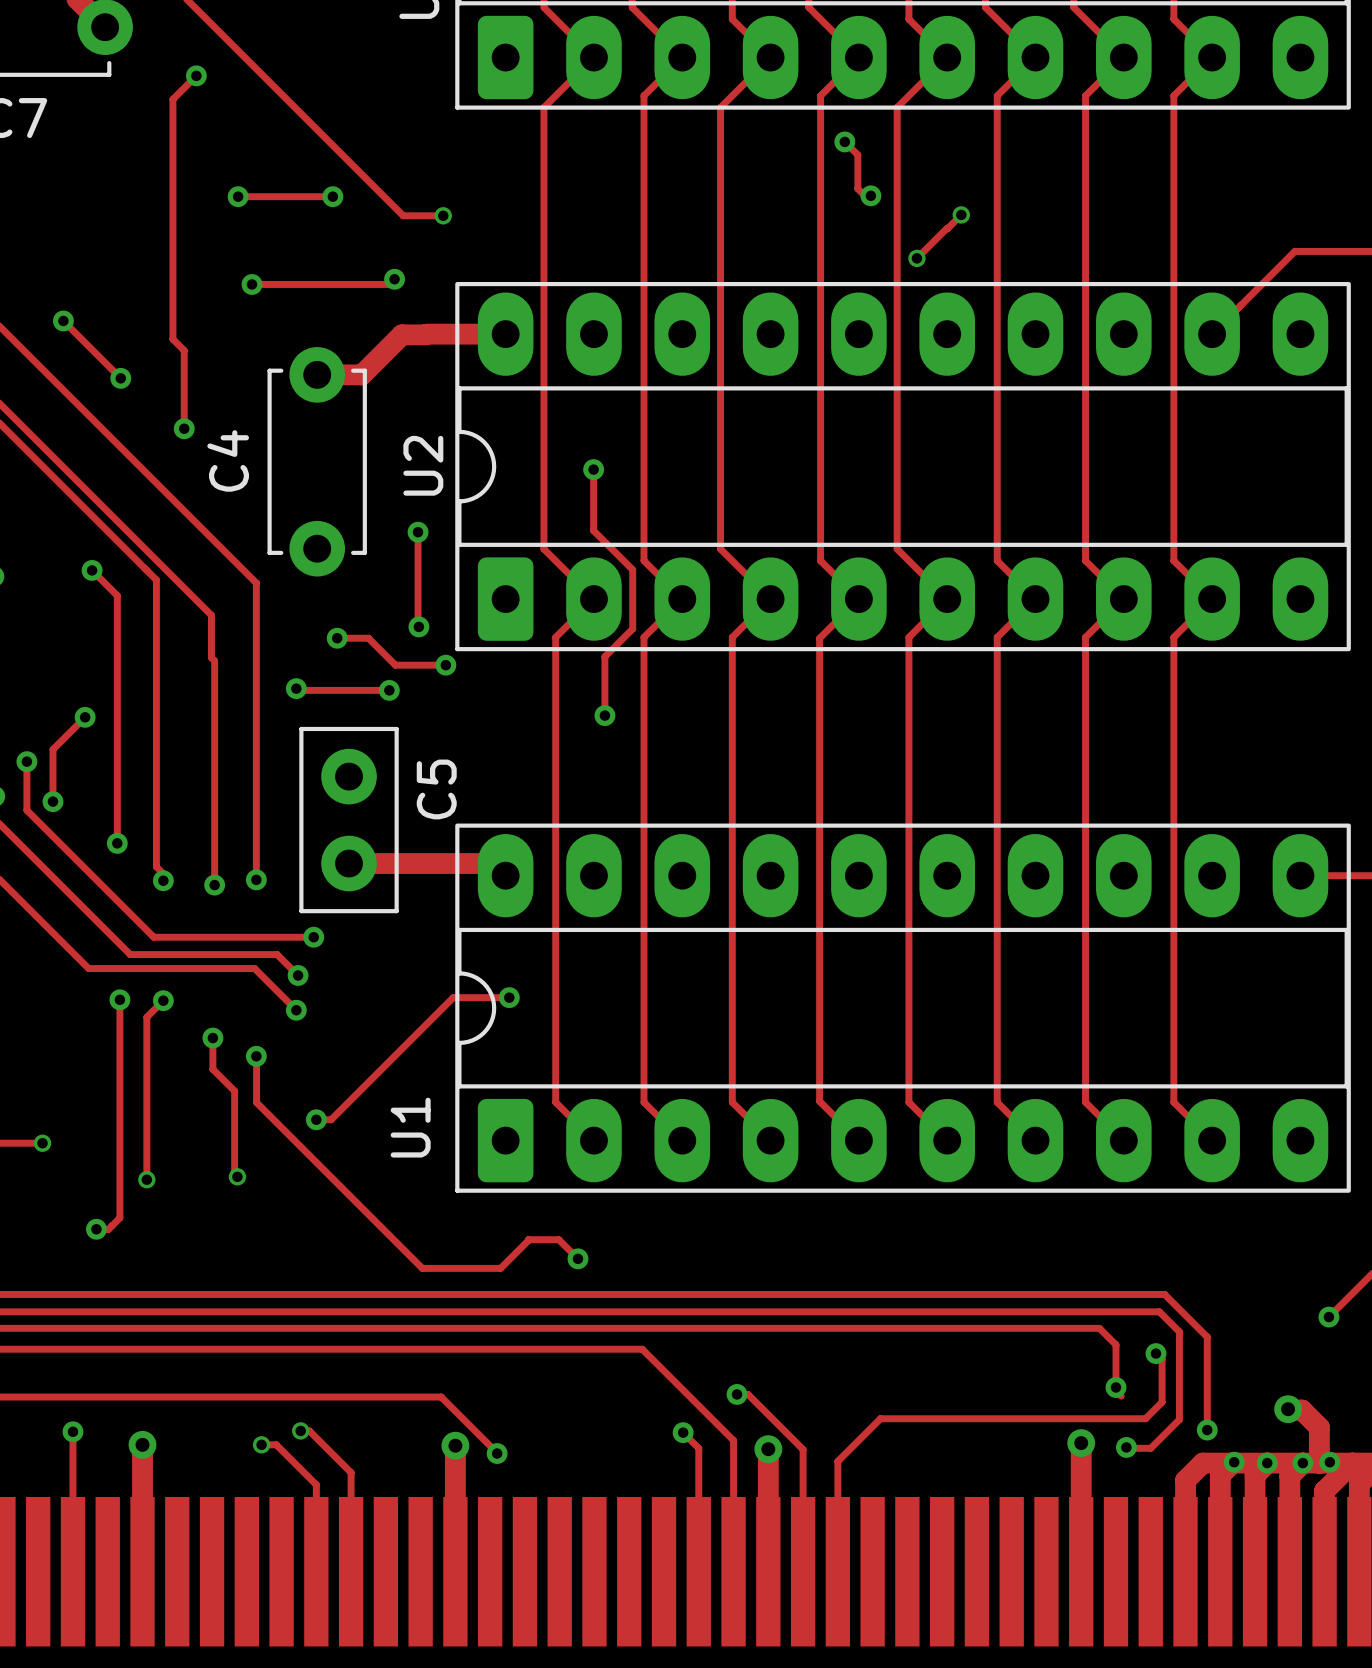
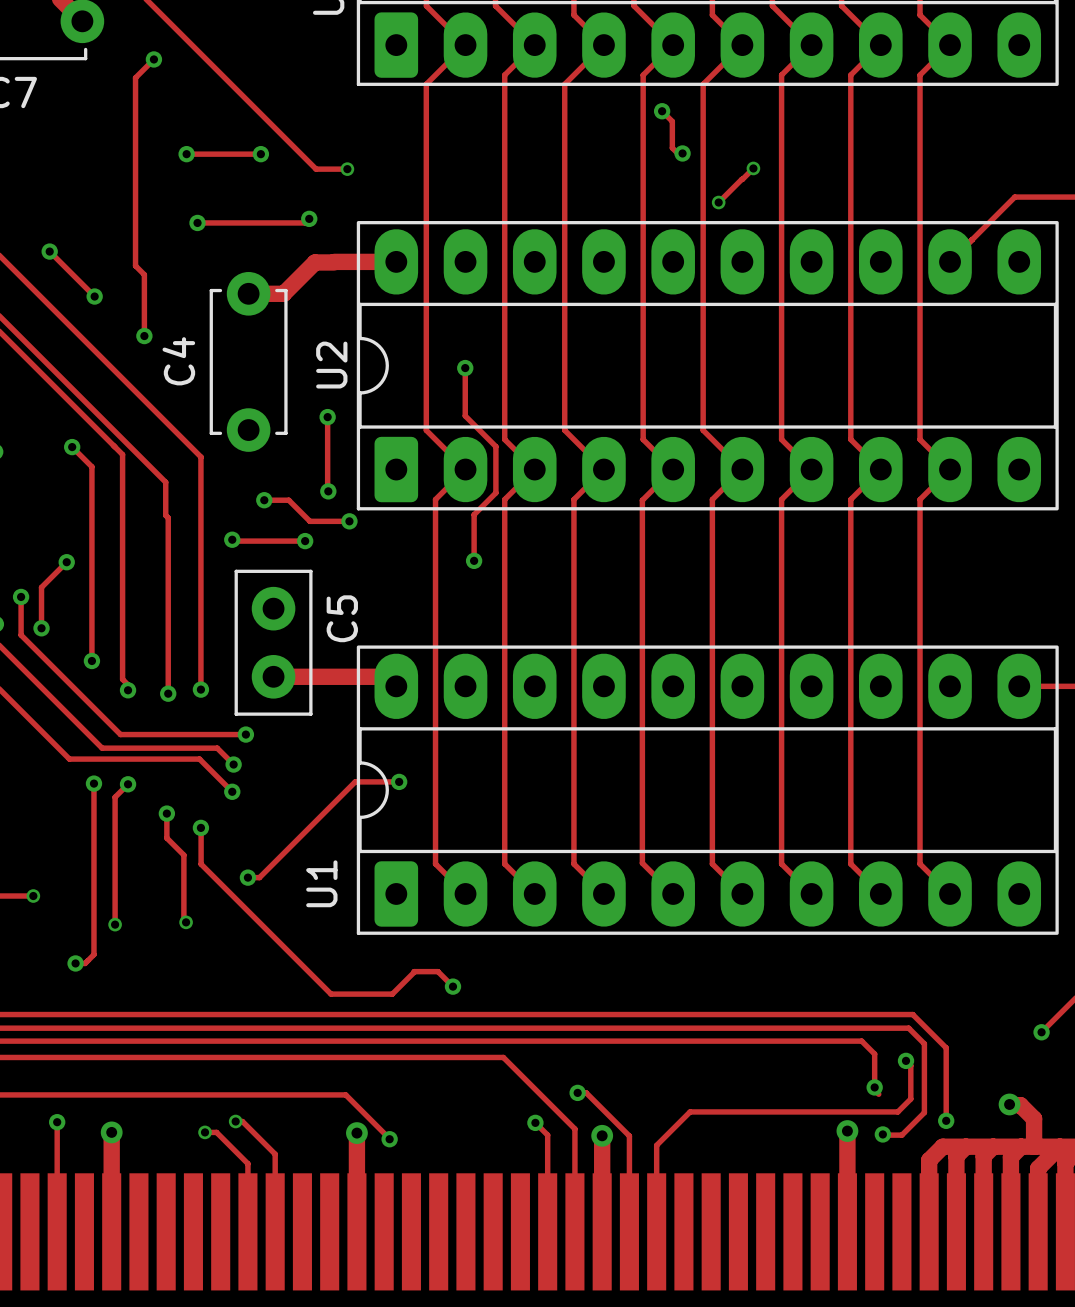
via: (1234, 1462) -> none
via: (1329, 1462) -> none
via: (1267, 1463) -> none
via: (1302, 1463) -> none

